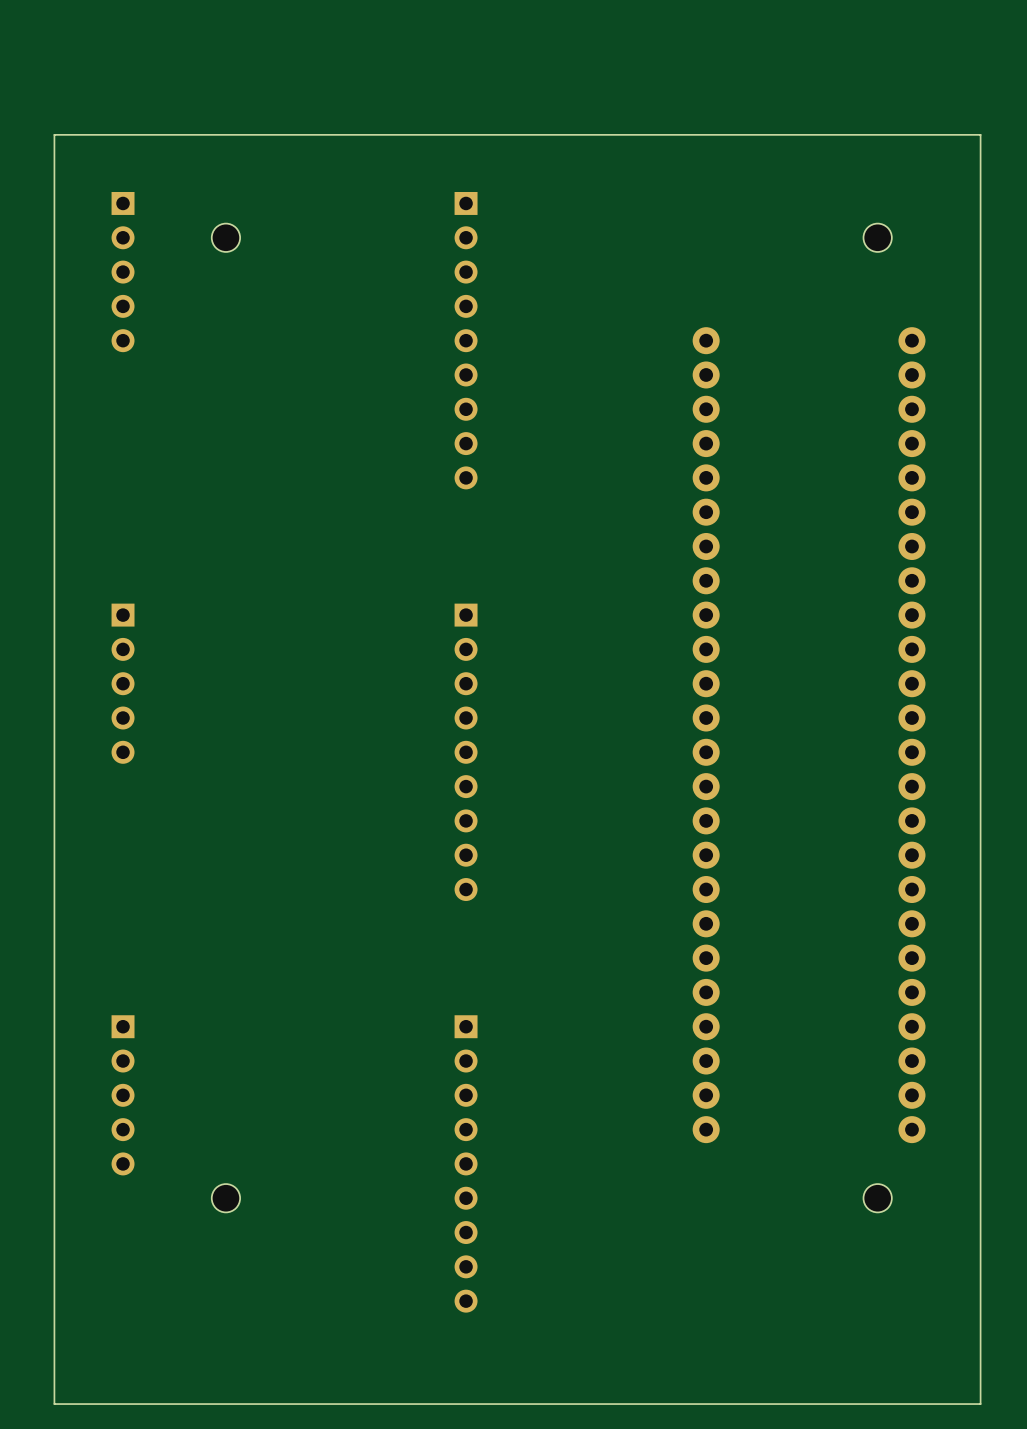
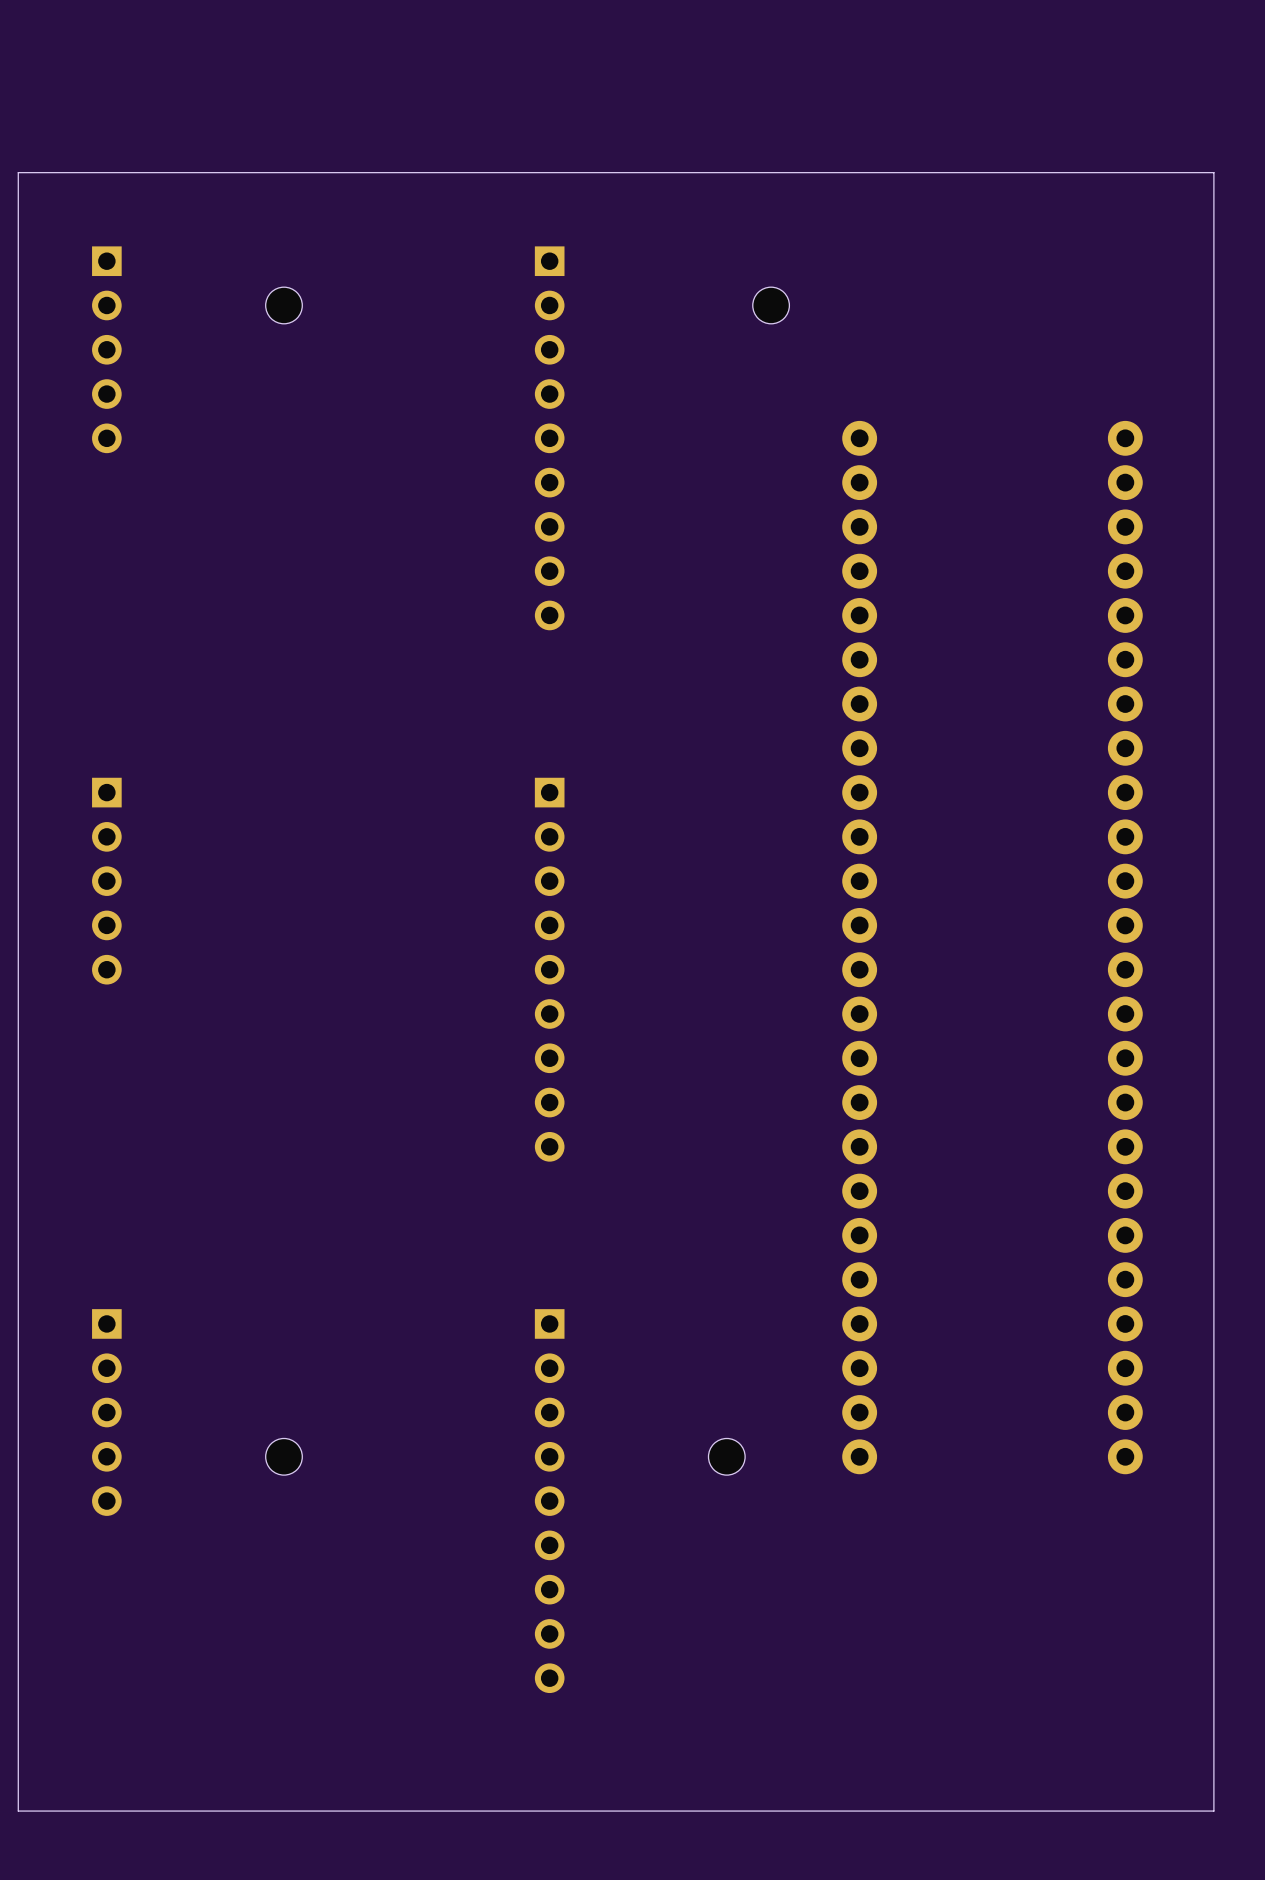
part position: (225, 237) -> (283, 305)
part: none -> (771, 305)
part: (877, 237) -> none
part: none -> (726, 1456)
part position: (225, 1198) -> (283, 1456)
part: (877, 1198) -> none

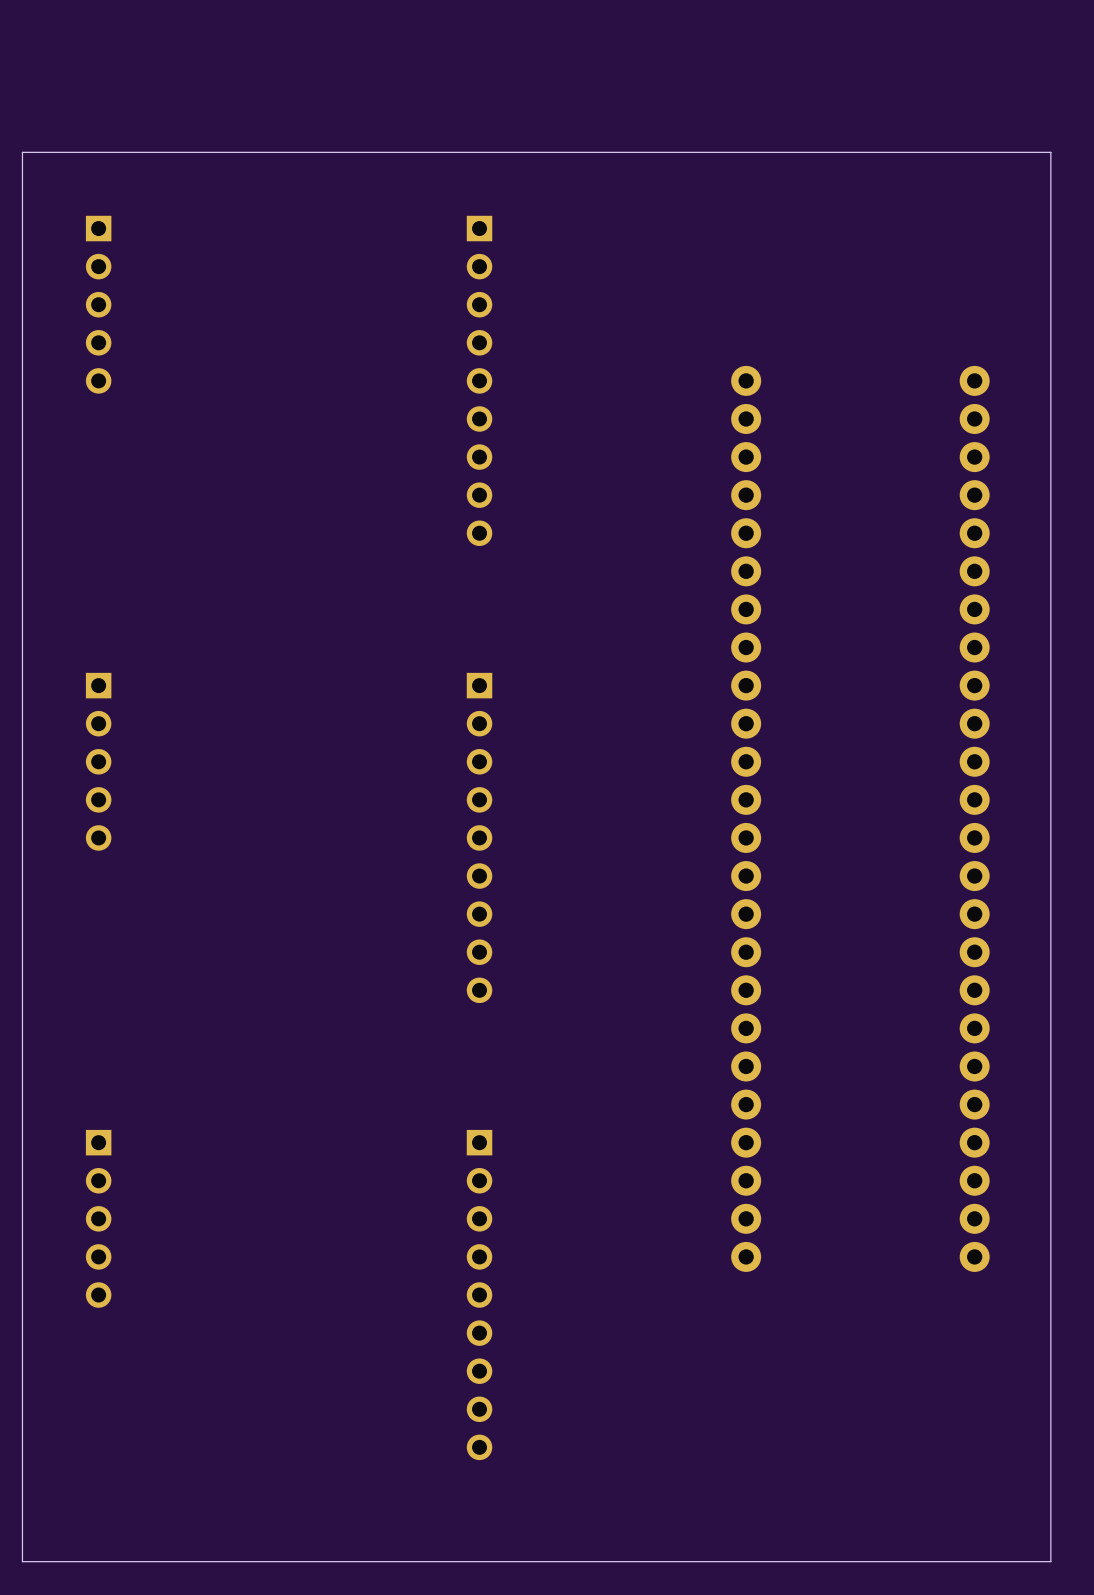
part: (283, 305) -> none
part: (771, 305) -> none
part: (283, 1456) -> none
part: (726, 1456) -> none

